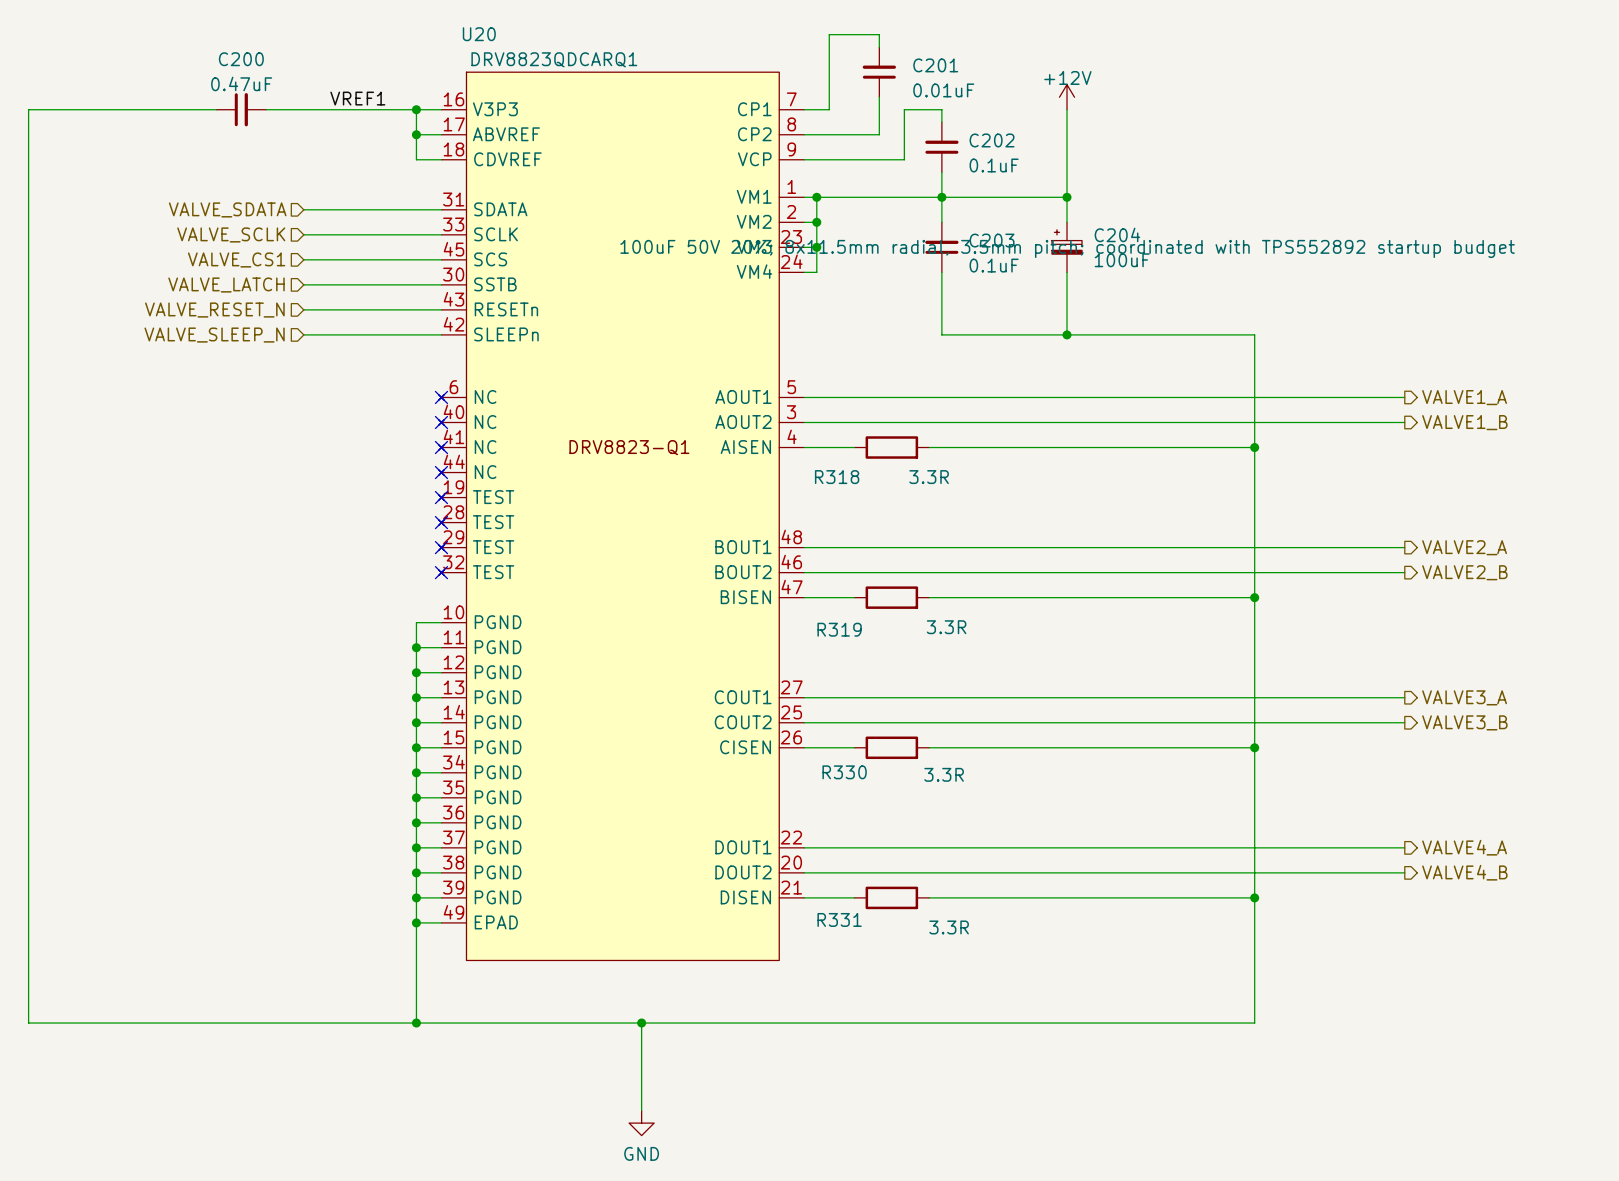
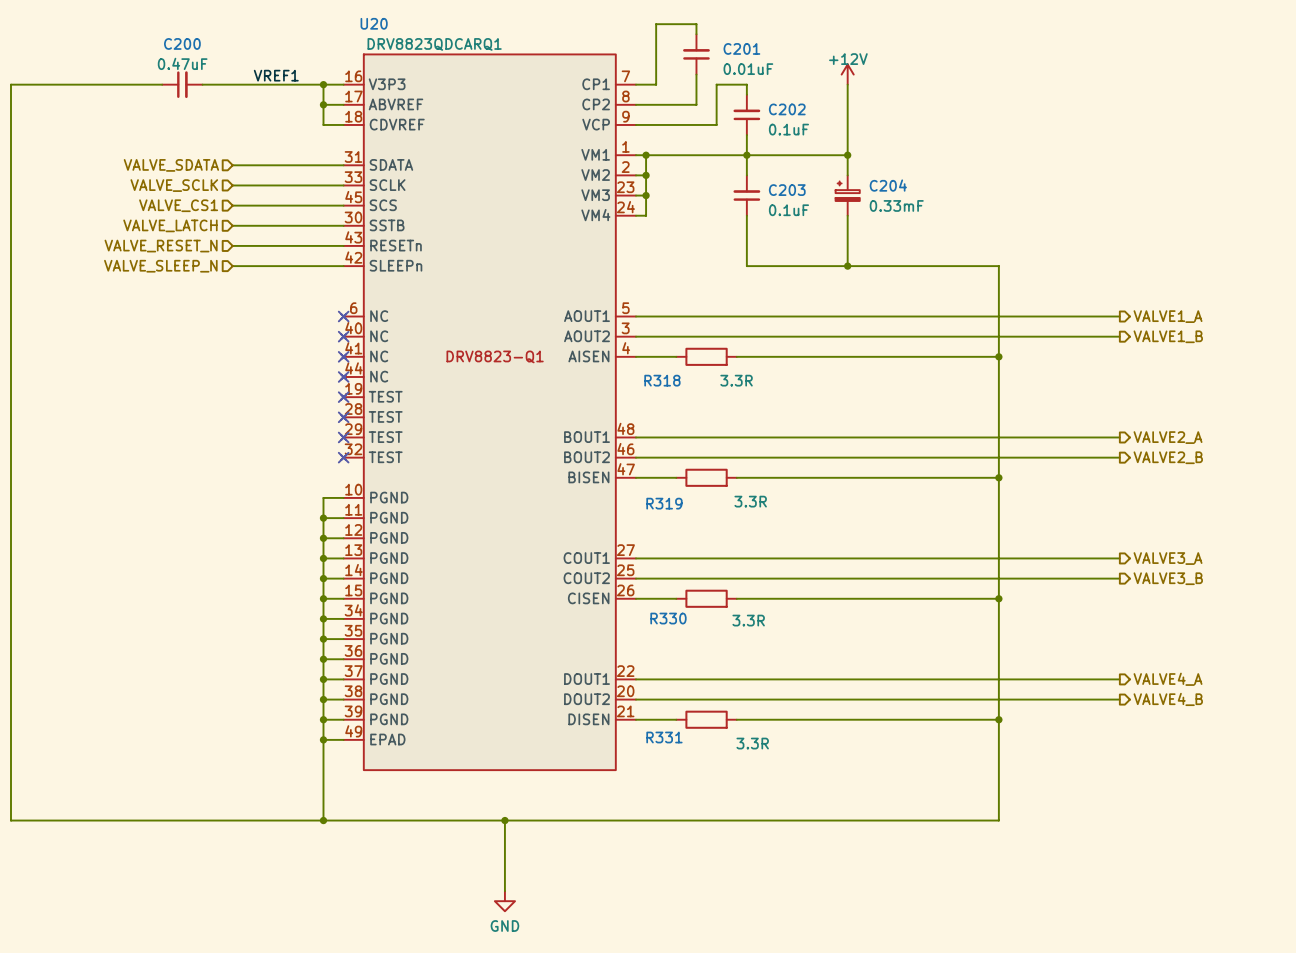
C204 text: 100uF 50V 20%; 8x11.5mm radial, 3.5mm pitch; coordinated with TPS552892 startup budget (1067, 248) -> none
C204 value: 100uF (1122, 260) -> 0.33mF (896, 205)

